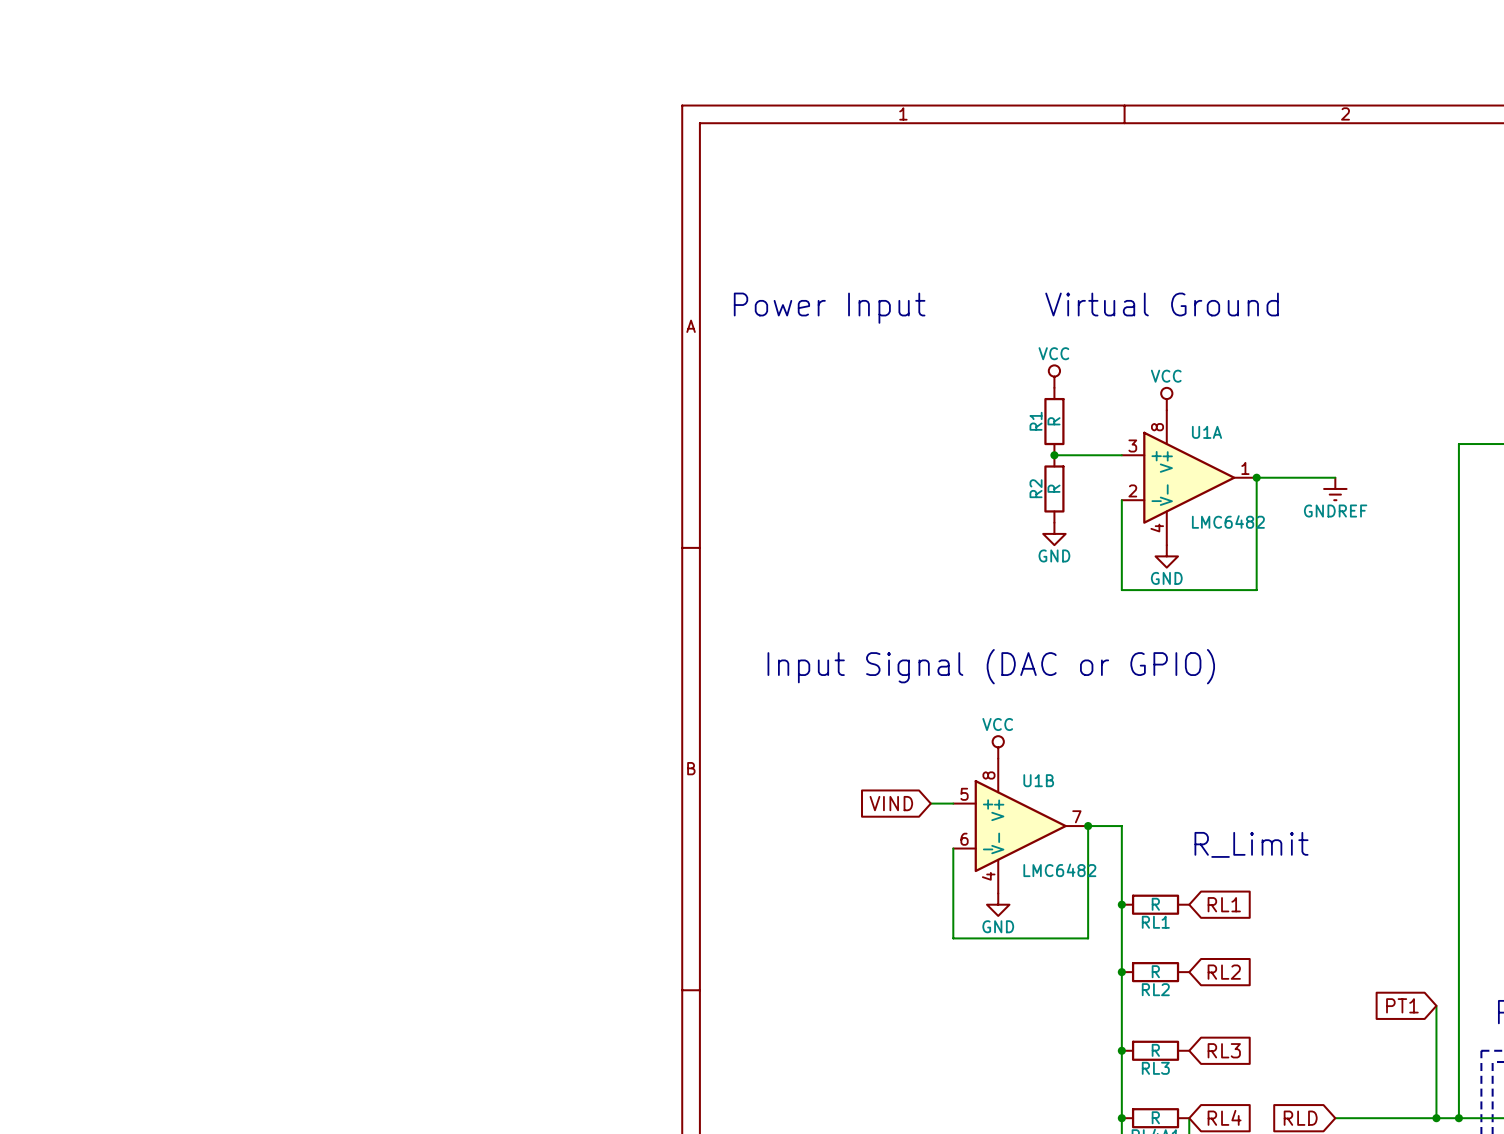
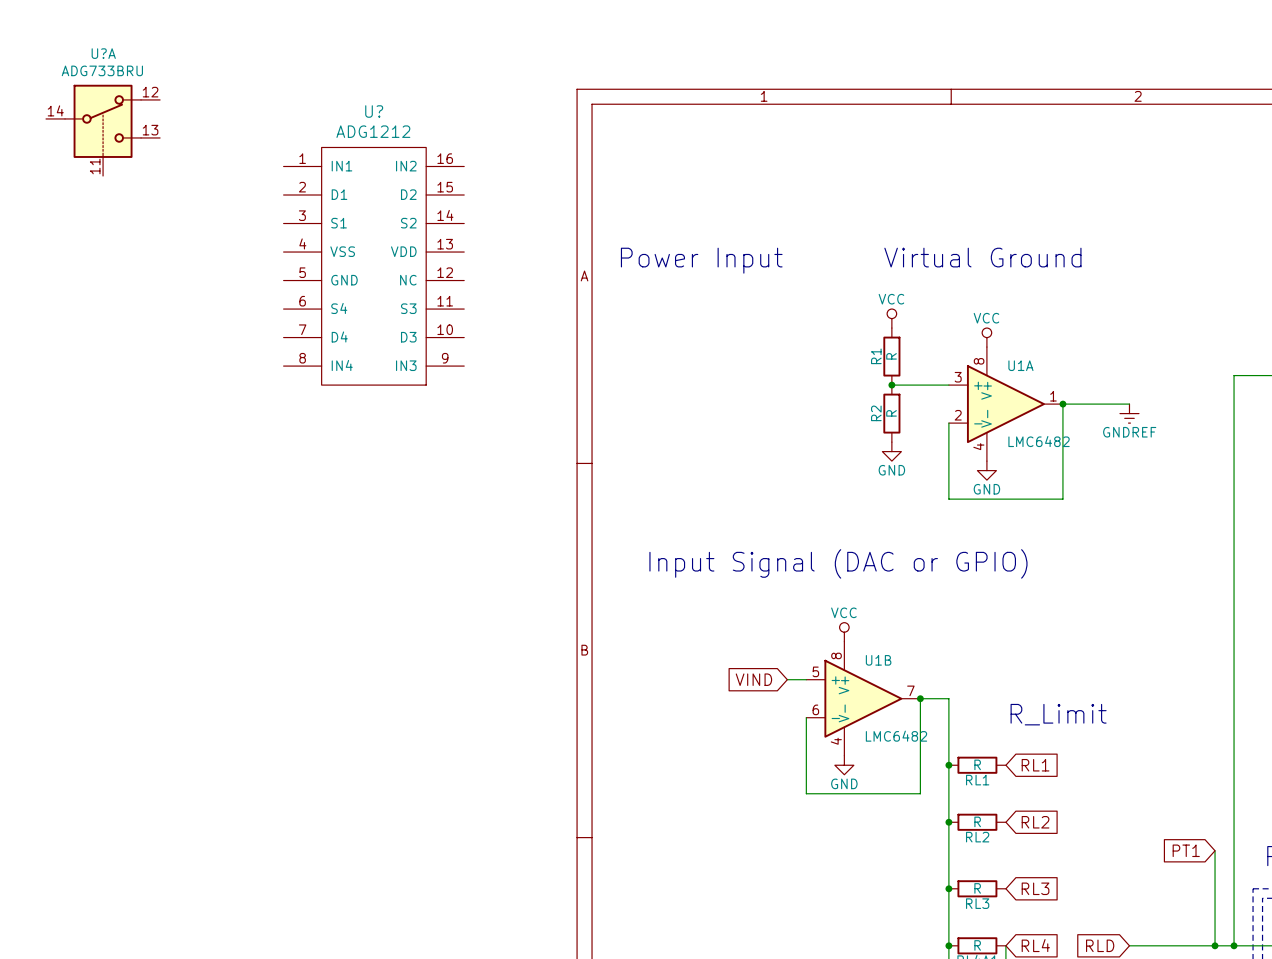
U?A: none -> ADG733BRU (103, 130)
U?: none -> ADG1212 (373, 266)

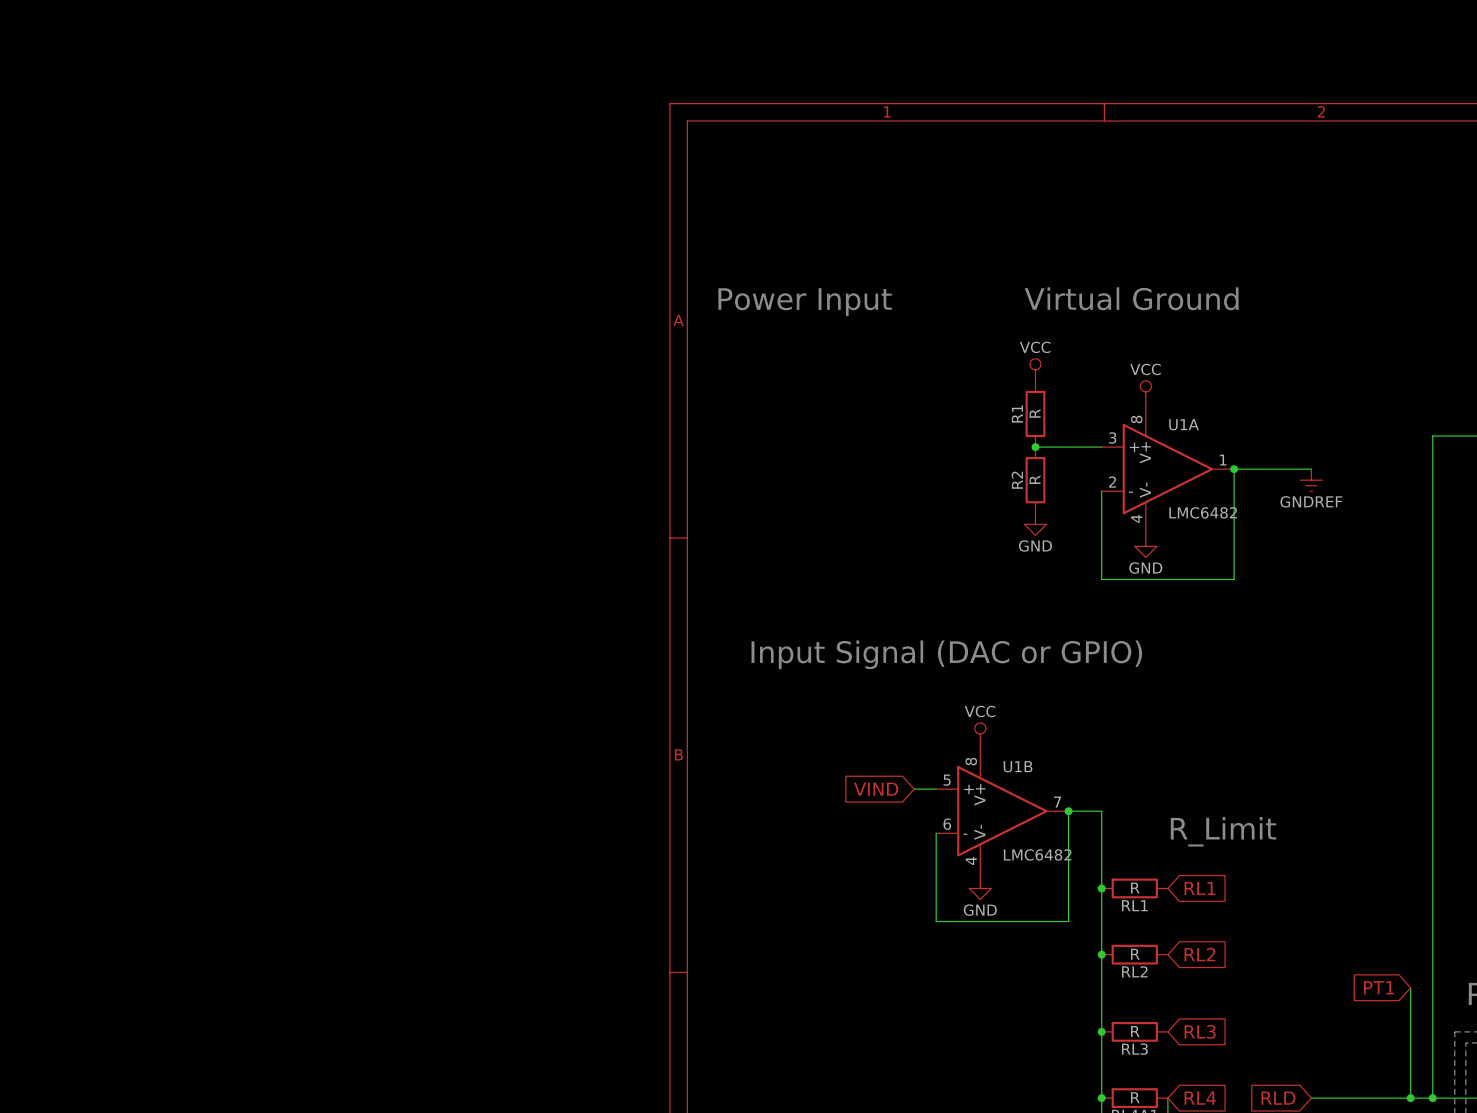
U?A: ADG733BRU (103, 130) -> none
U?: ADG1212 (373, 266) -> none

